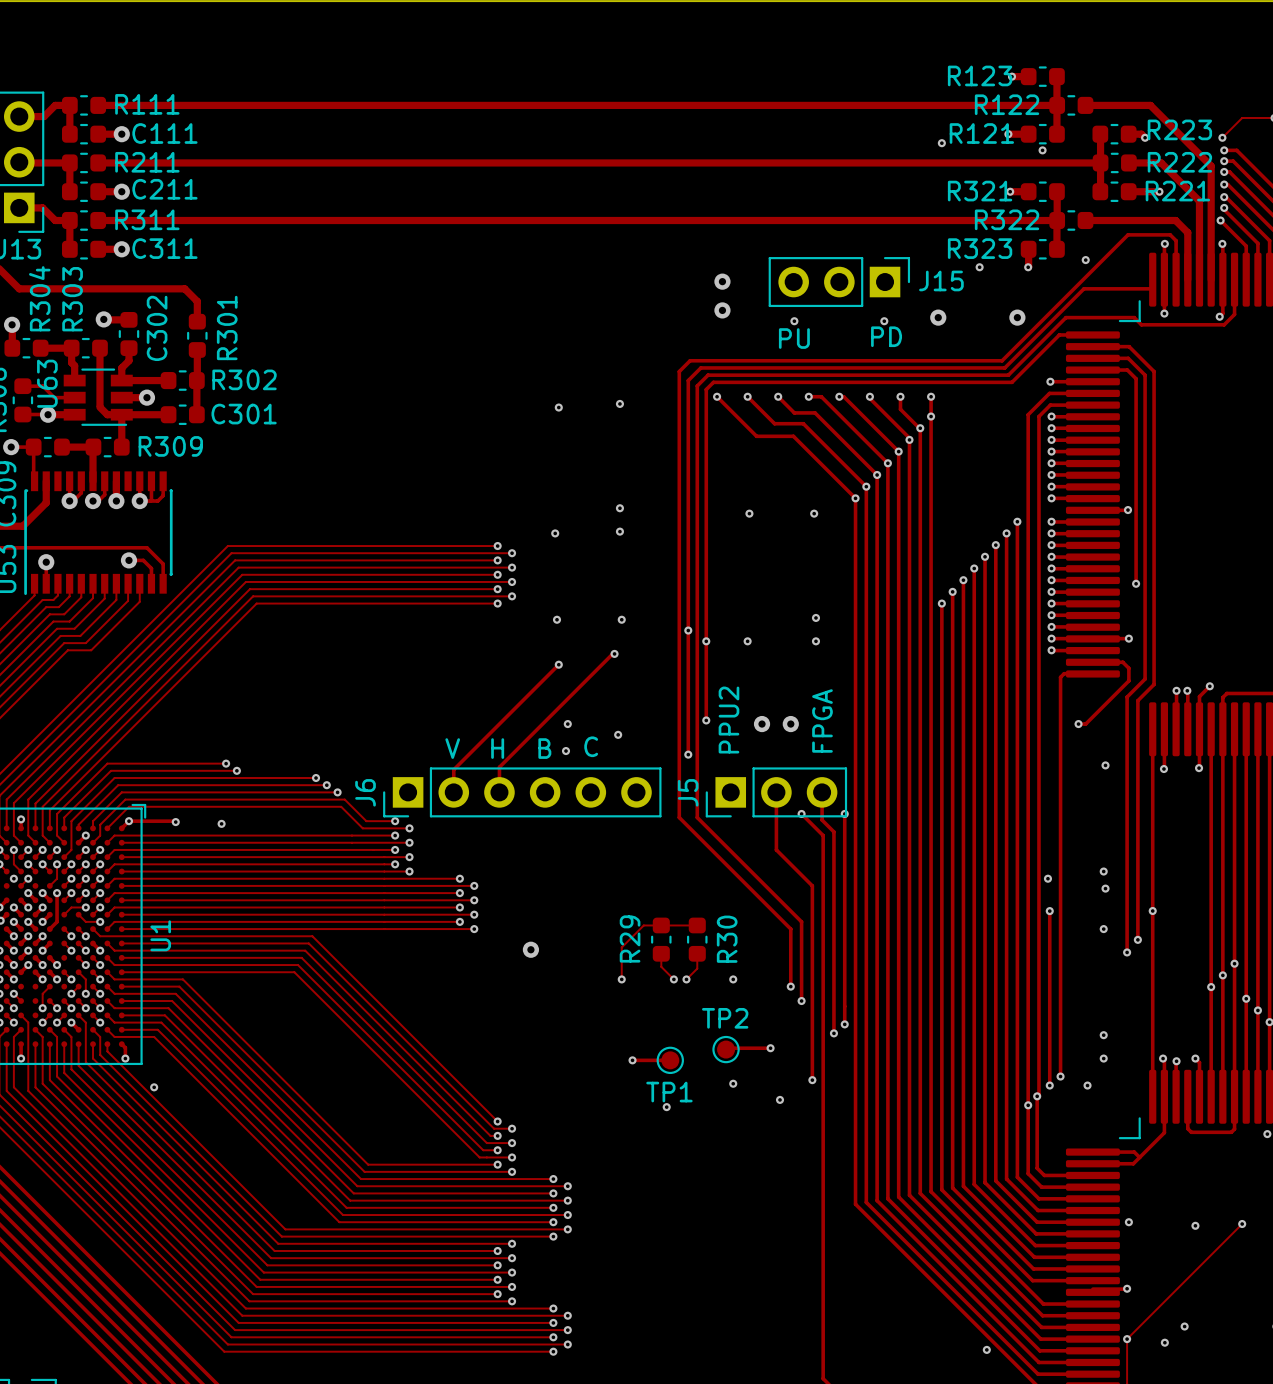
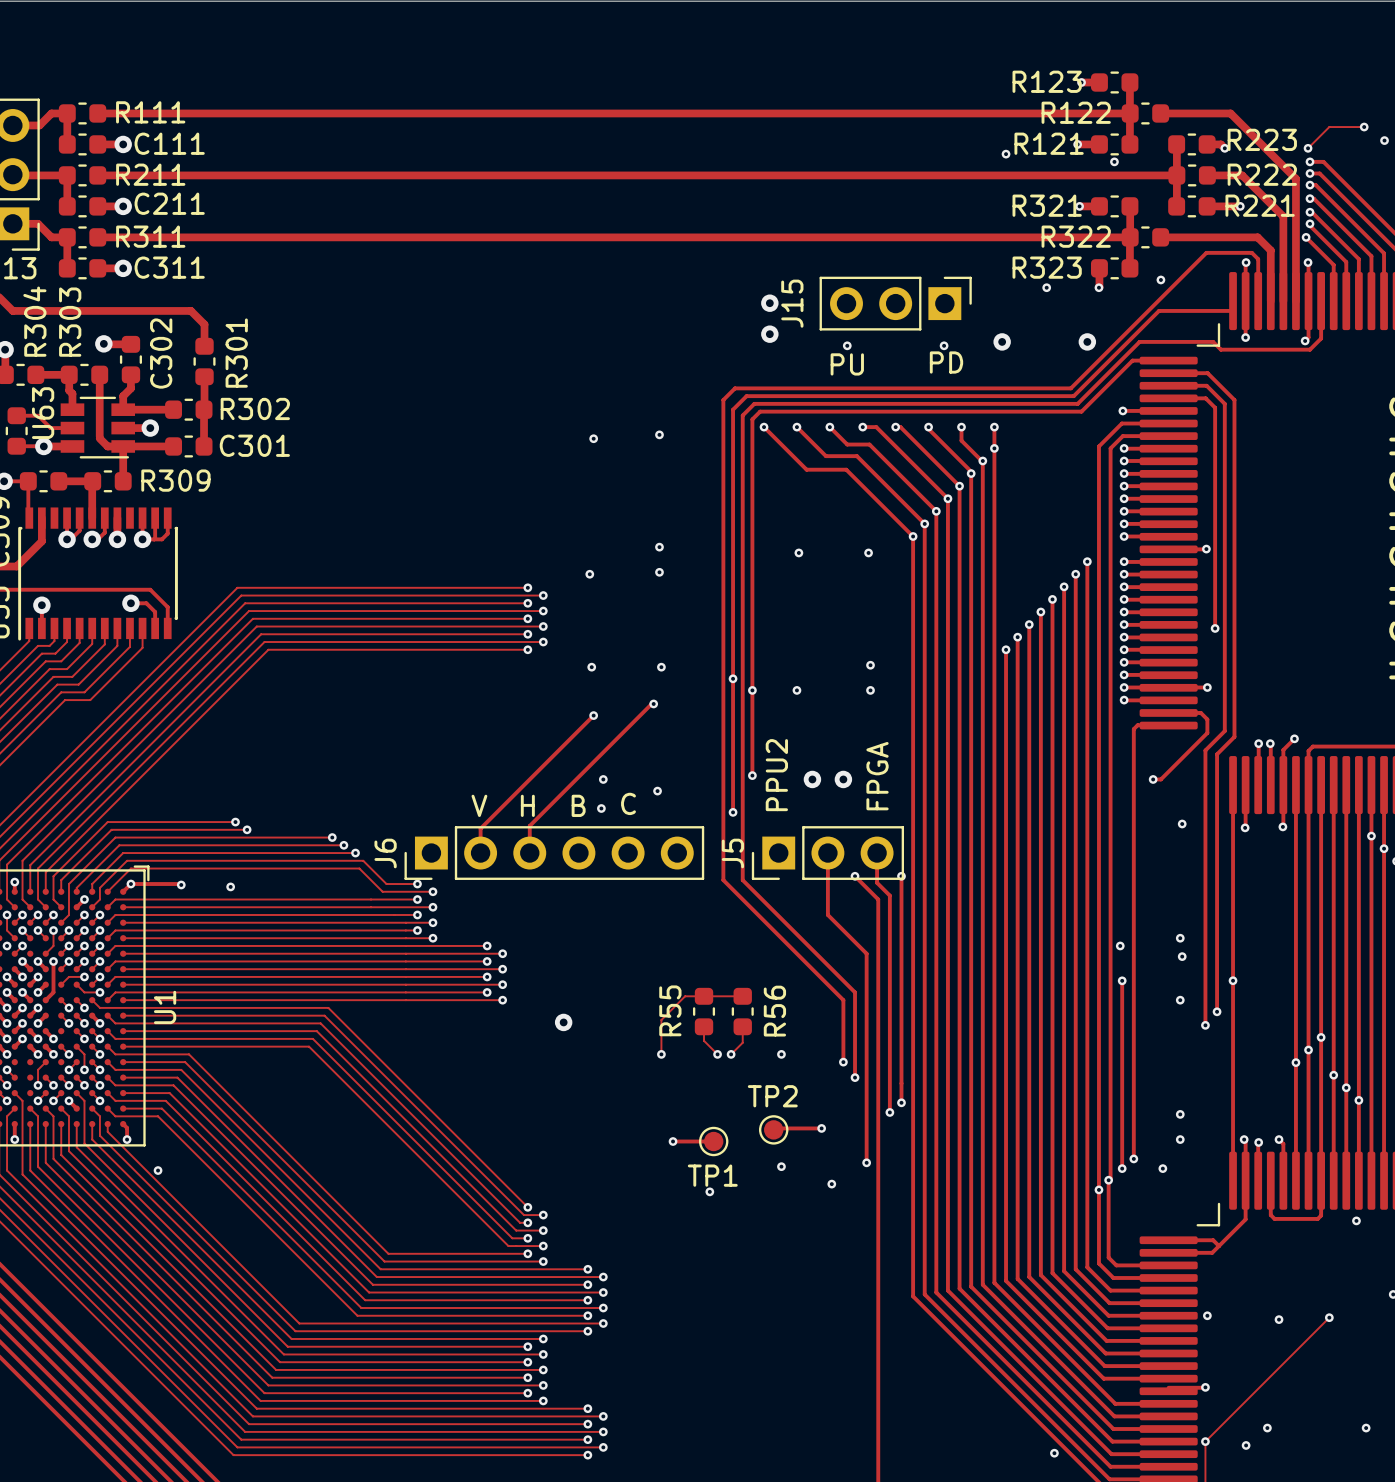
J15 name rotation: 0° (941, 280) -> 90° counterclockwise (792, 303)
J15 name position: J15 (941, 280) -> J15 (792, 303)
R29 name: R29 (630, 938) -> R55 (670, 1010)
R30 name: R30 (727, 939) -> R56 (774, 1011)

